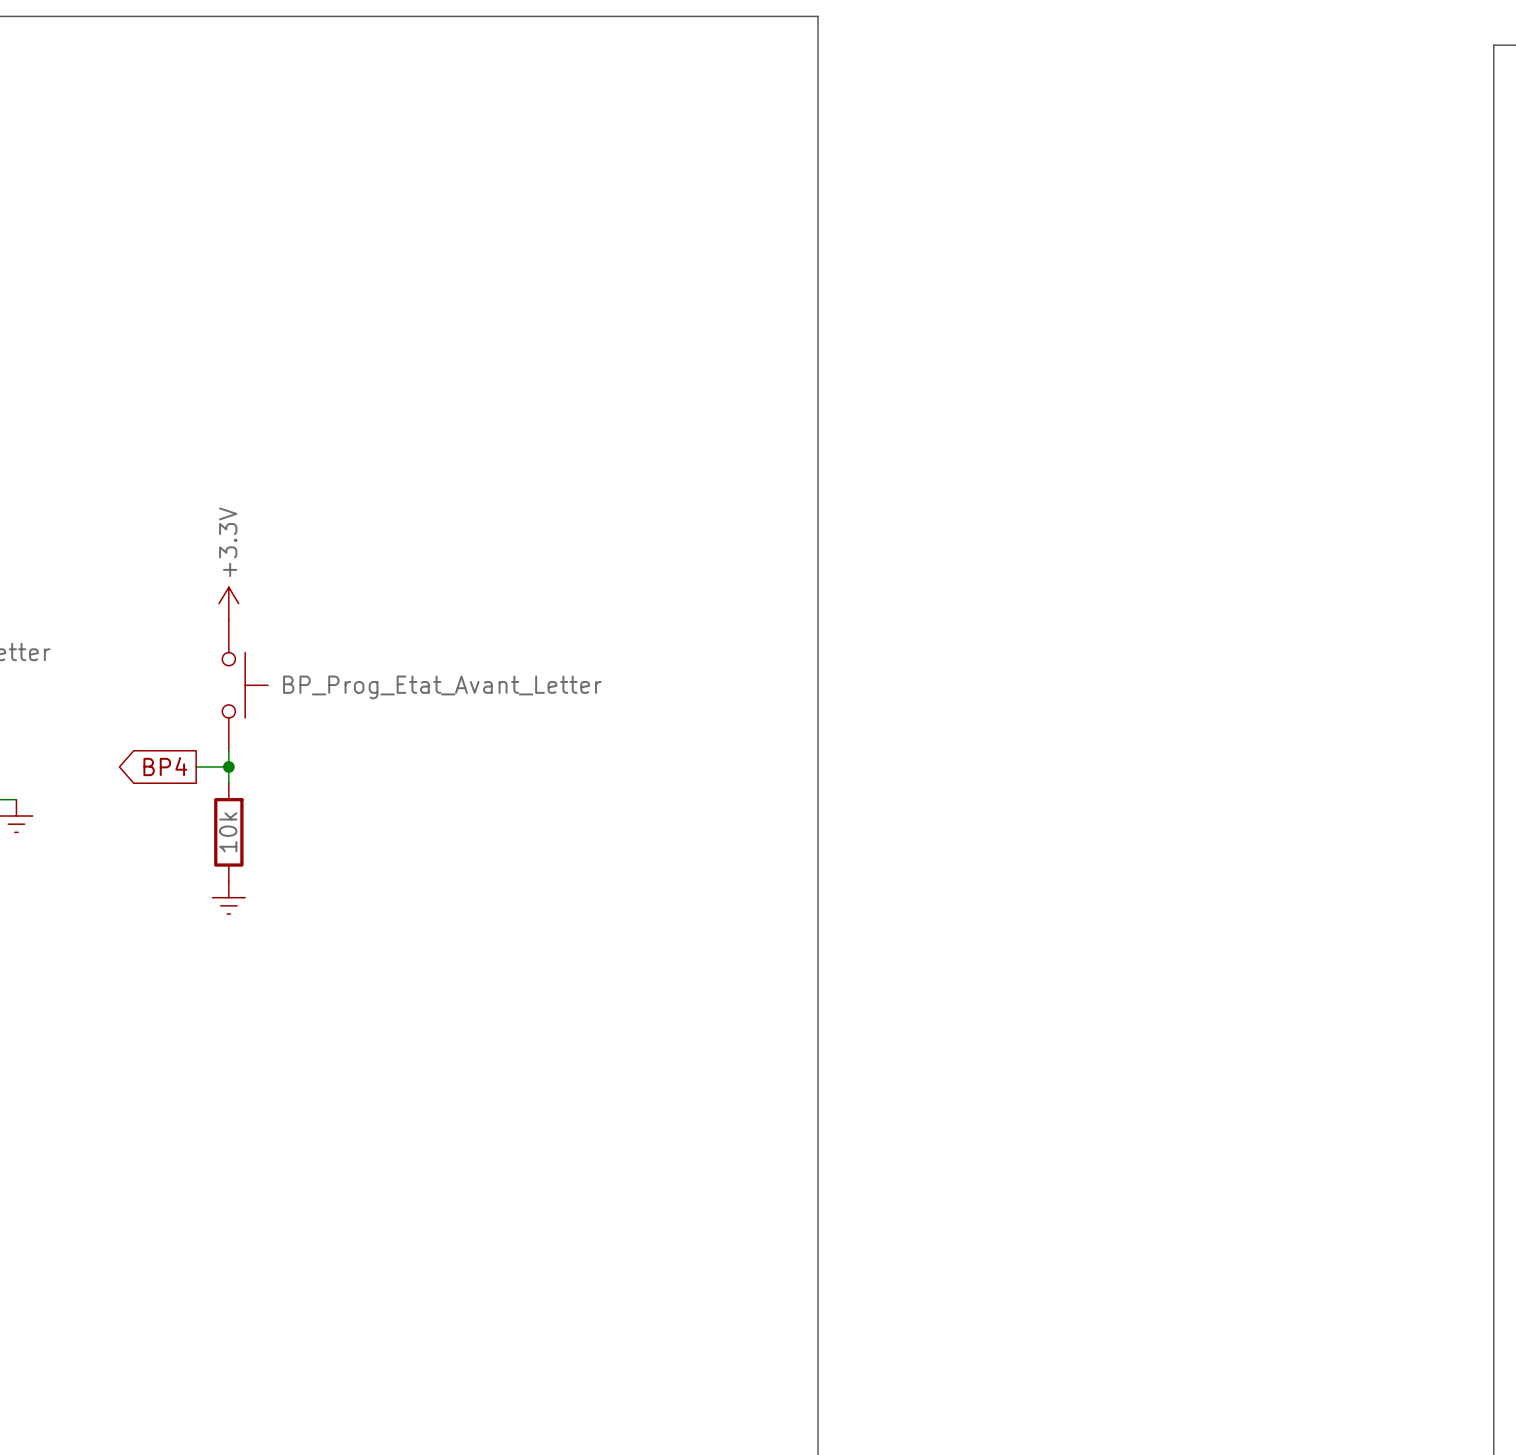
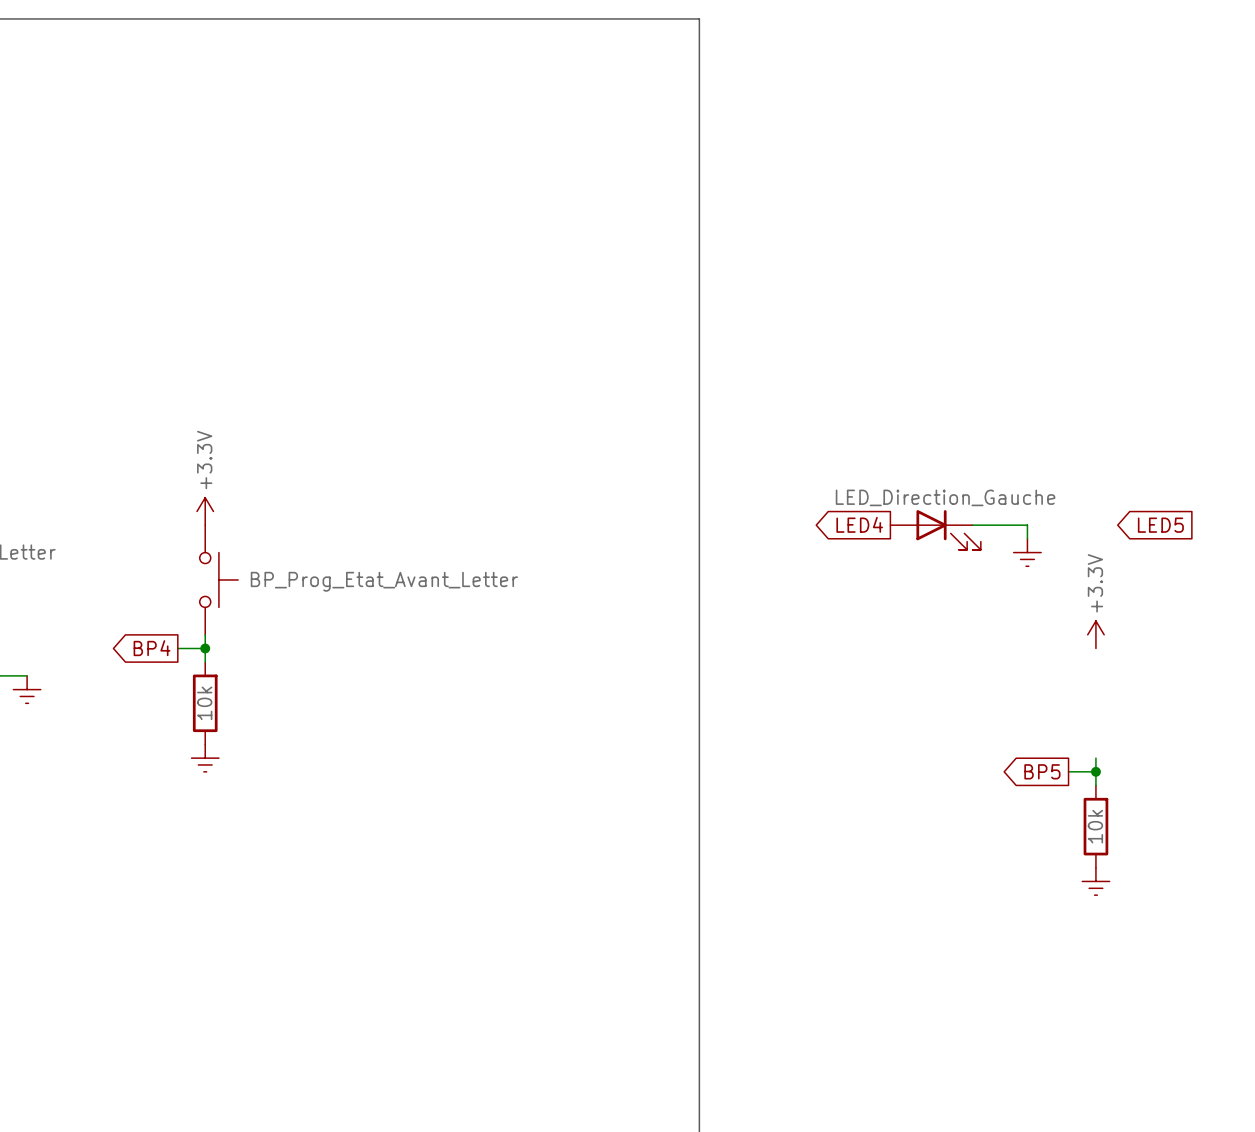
global label: none -> LED4 (859, 524)
wire: none -> (972, 525) (1027, 525) (1027, 538)
global label: none -> LED5 (1160, 525)
part: none -> LED_Direction_Gauche (935, 529)
power symbol: none -> (1027, 552)
power symbol: none -> +3.3V (1095, 634)
wire: none -> (1095, 758) (1095, 785)
global label: none -> BP5 (1042, 771)
wire: none -> (1068, 771) (1095, 771)
junction: none -> (1095, 771)
part: none -> 10k (1095, 826)
power symbol: none -> (1095, 881)

